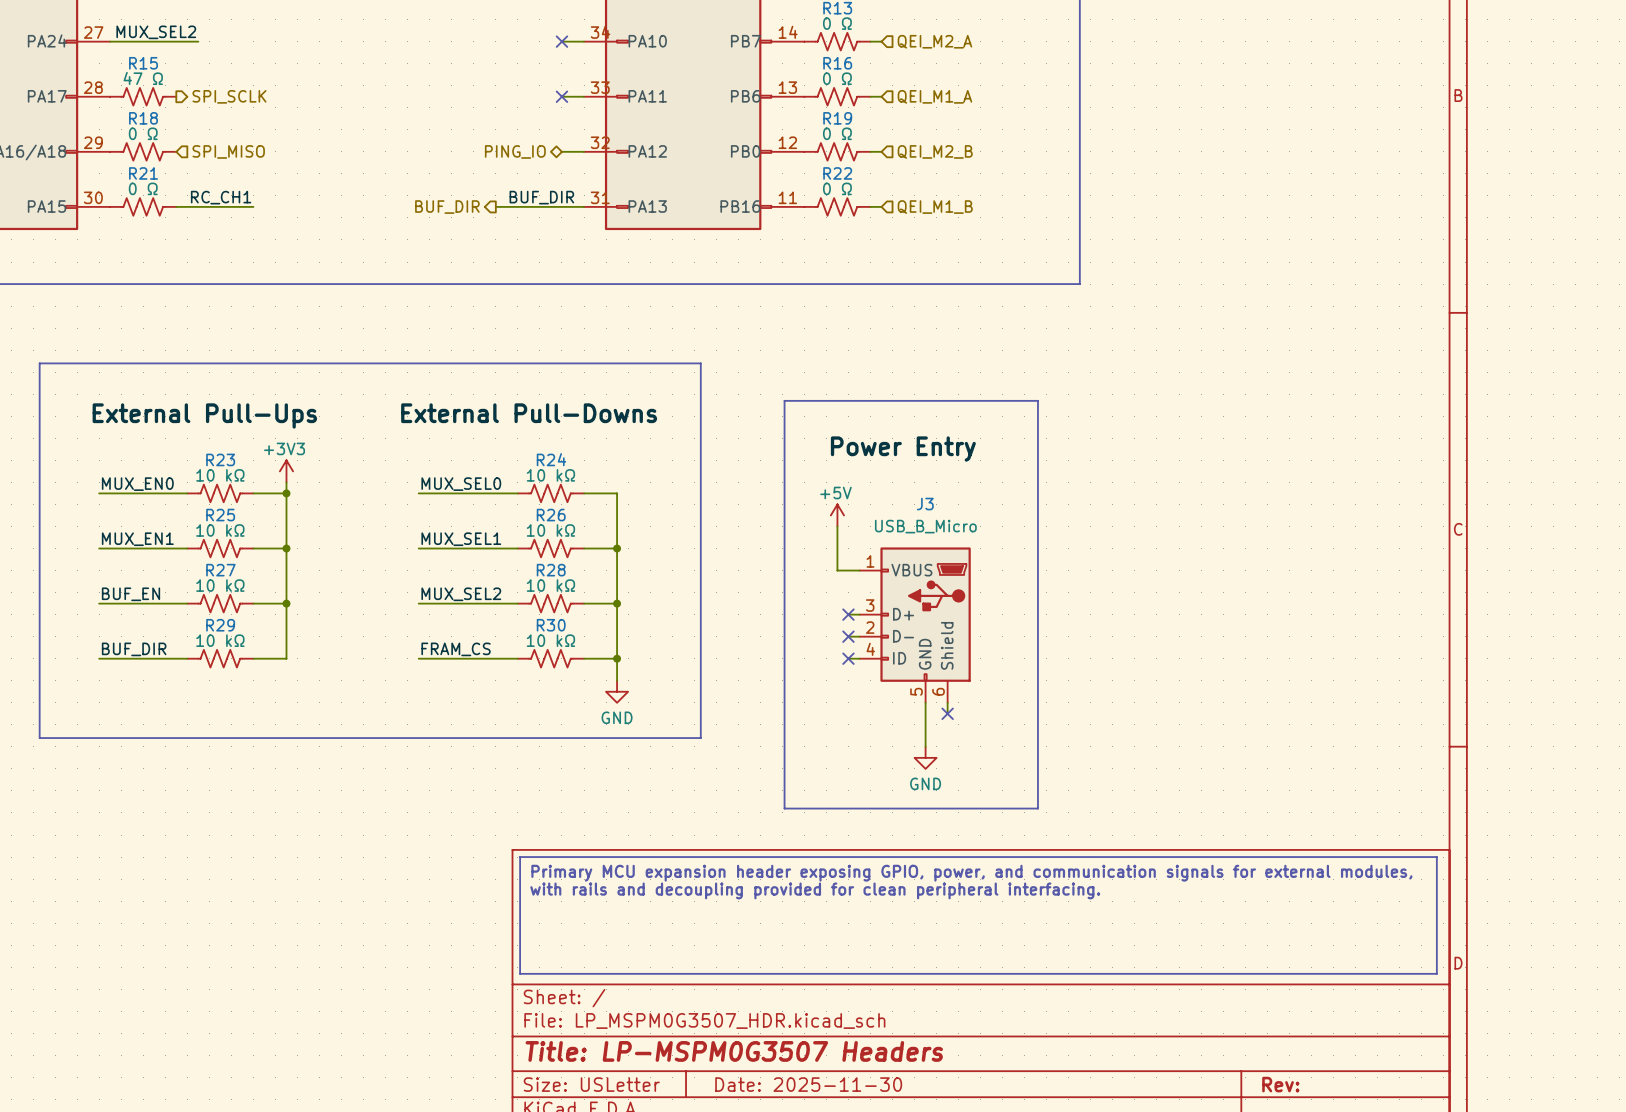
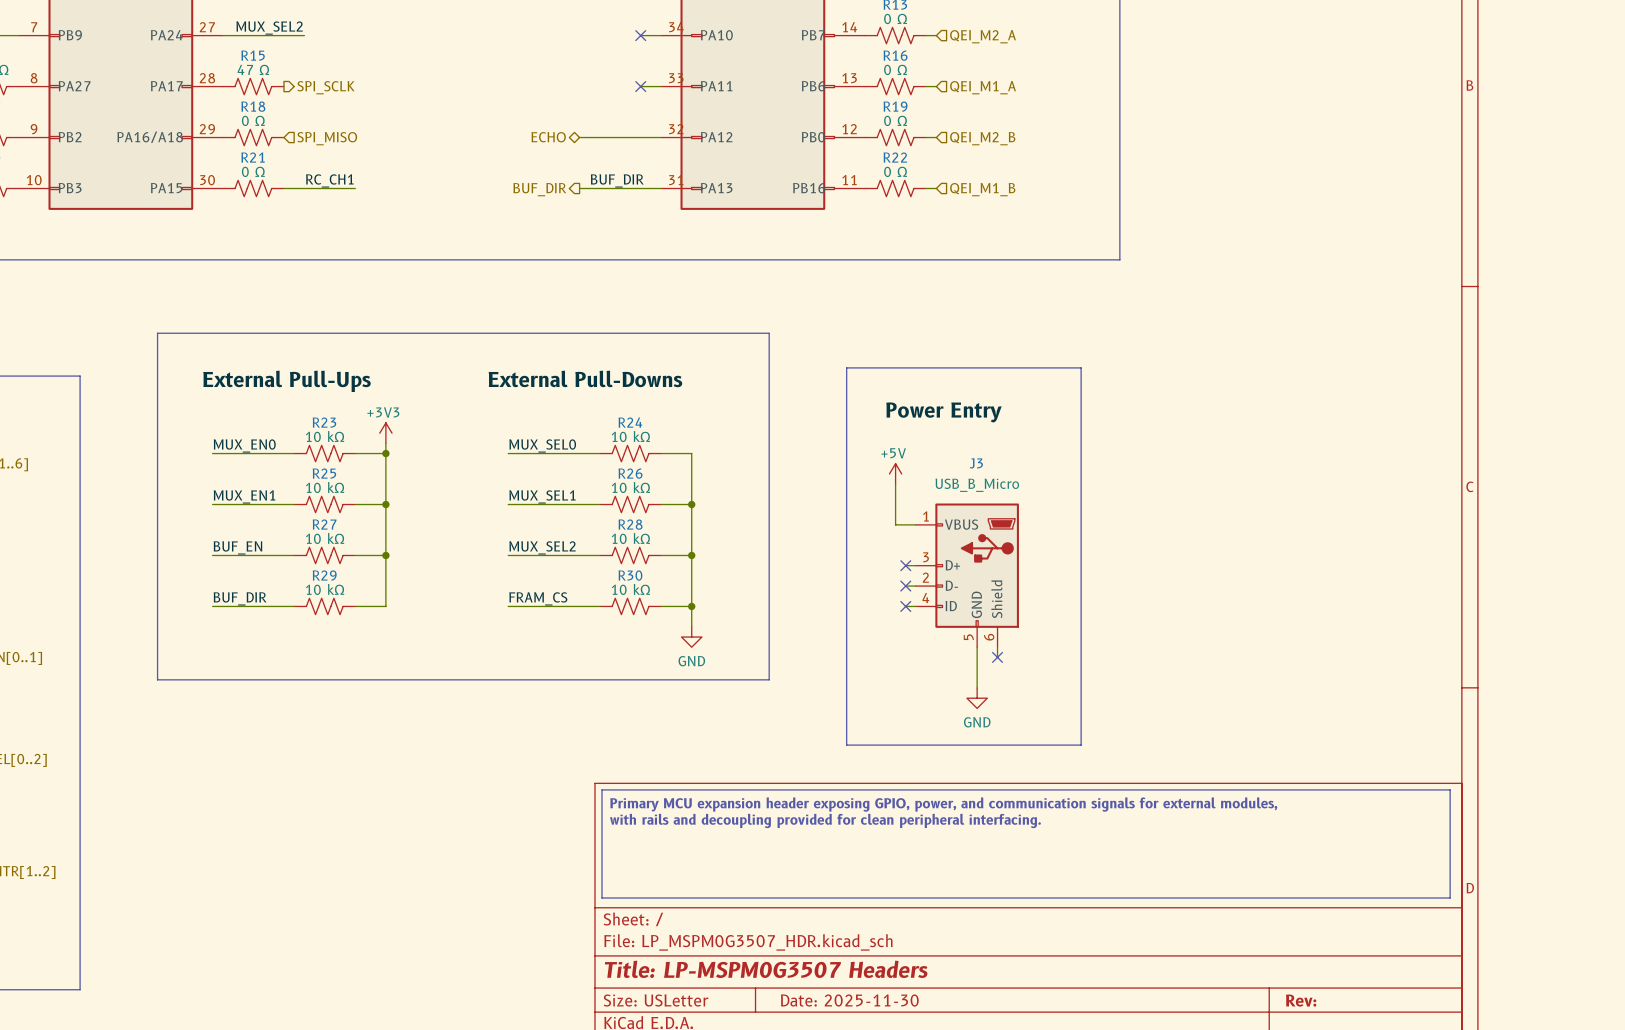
hierarchical label: none -> ECHO (548, 137)
wire: none -> (579, 137) (640, 137)
hierarchical label: PING_IO (515, 151) -> none

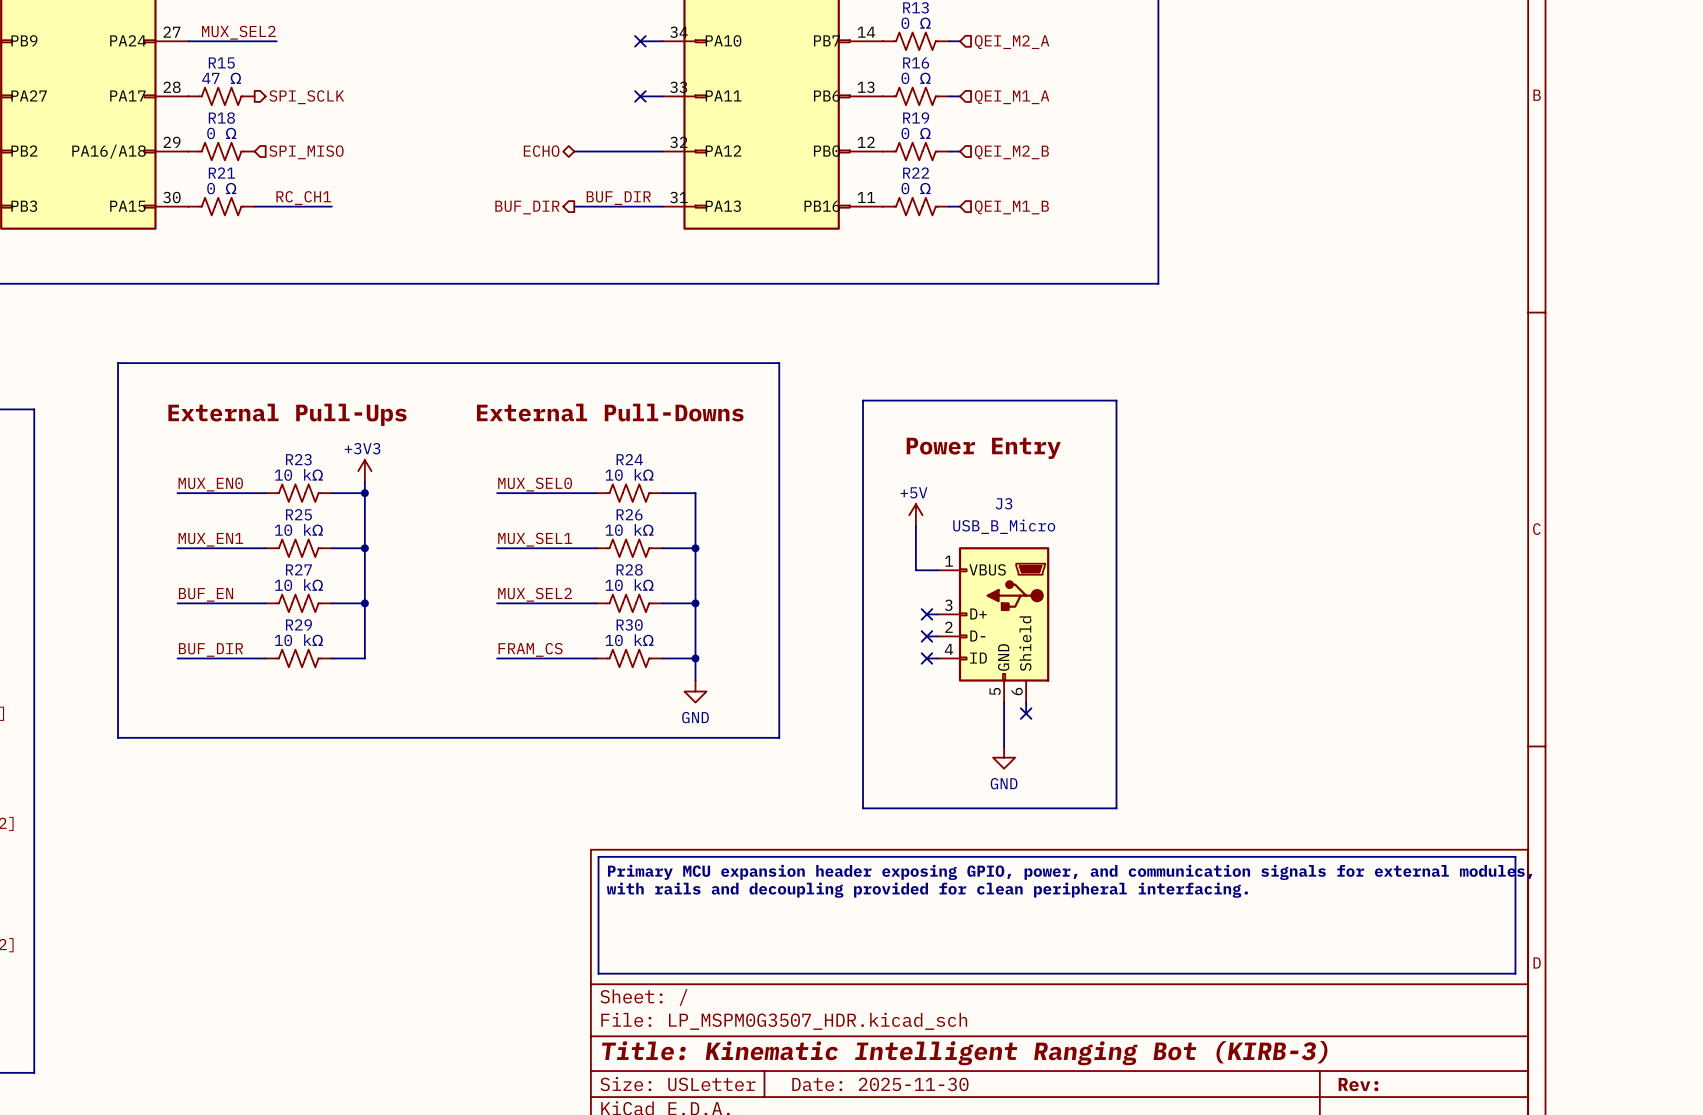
title block: Title: LP-MSPM0G3507 Headers (766, 969) -> Title: Kinematic Intelligent Ranging Bot (KIRB-3) (964, 1053)

